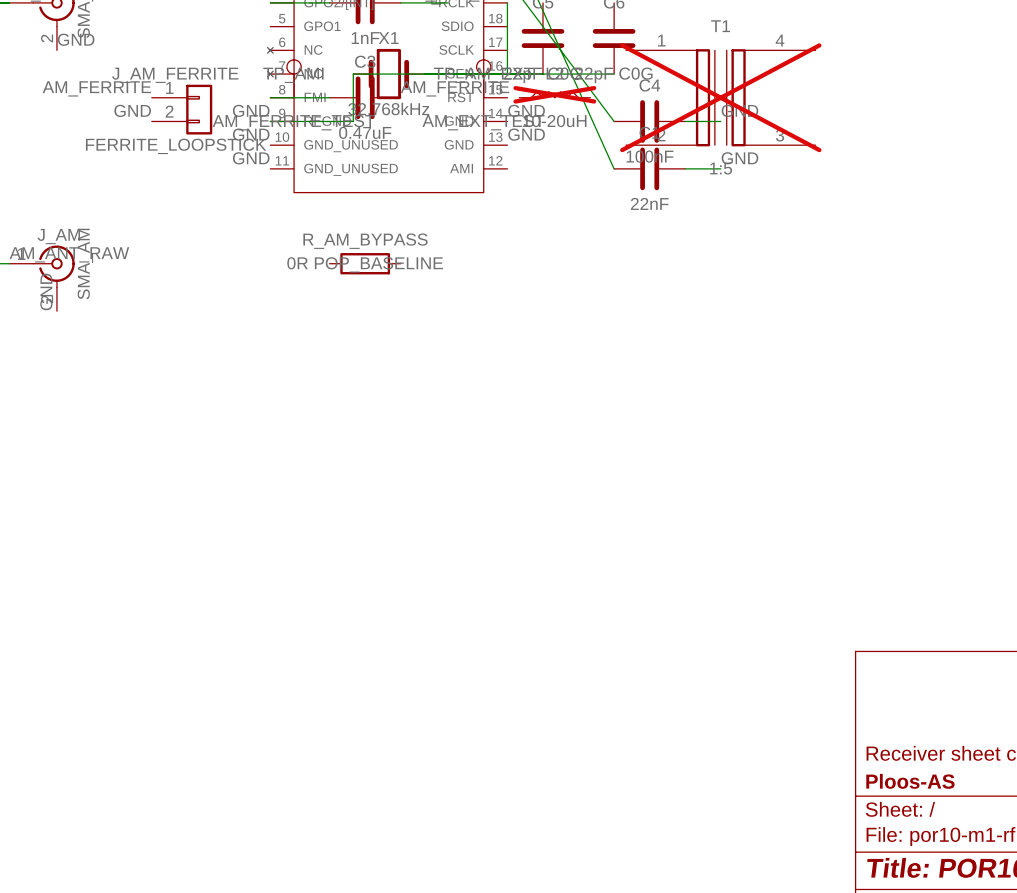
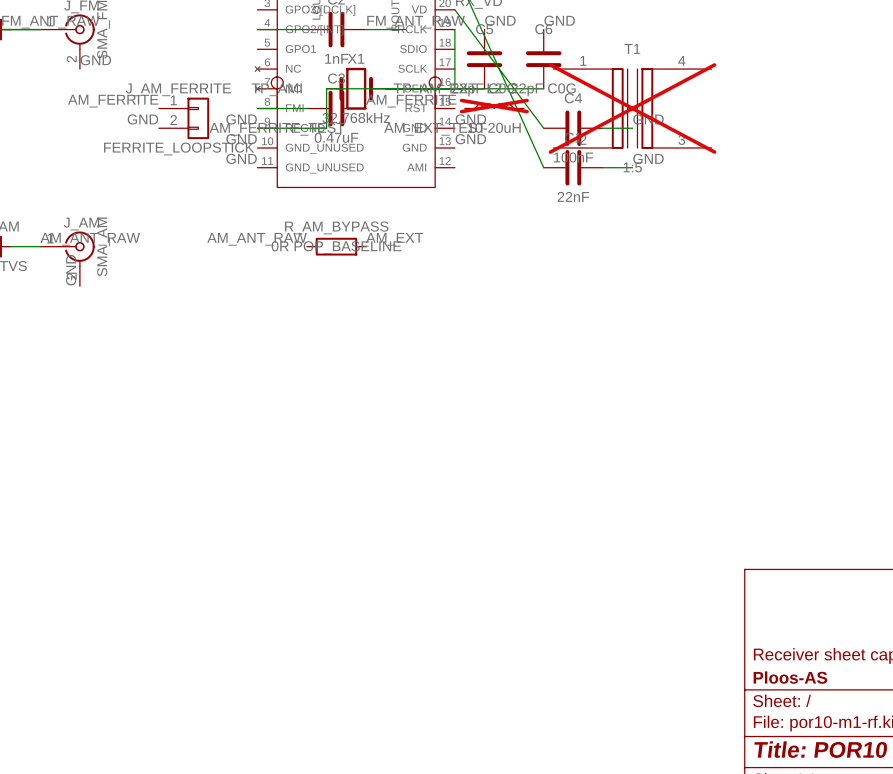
label: none -> AM_ANT_RAW (257, 239)
label: none -> AM_EXT (394, 239)

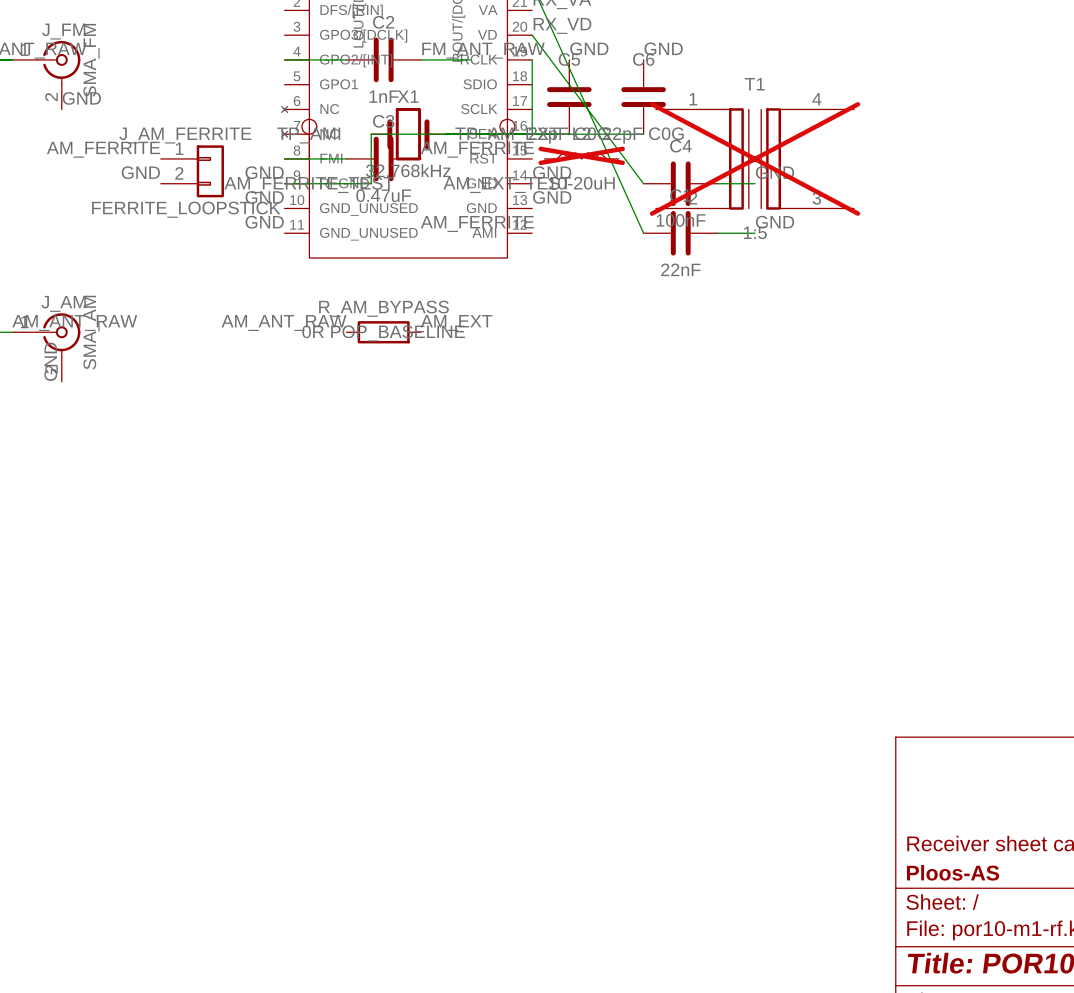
label: none -> AM_FERRITE (477, 223)

